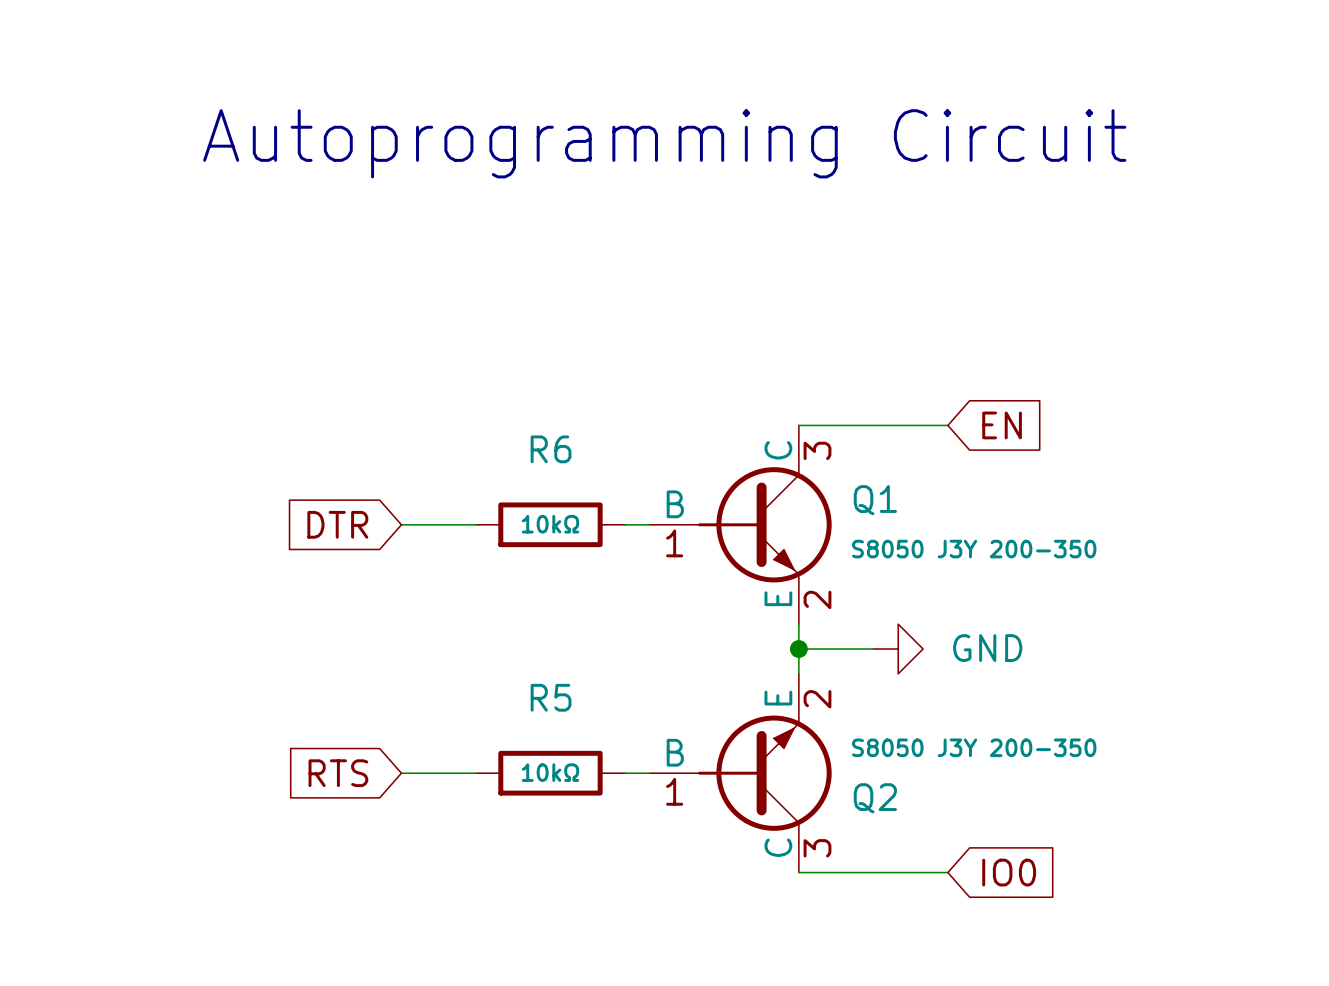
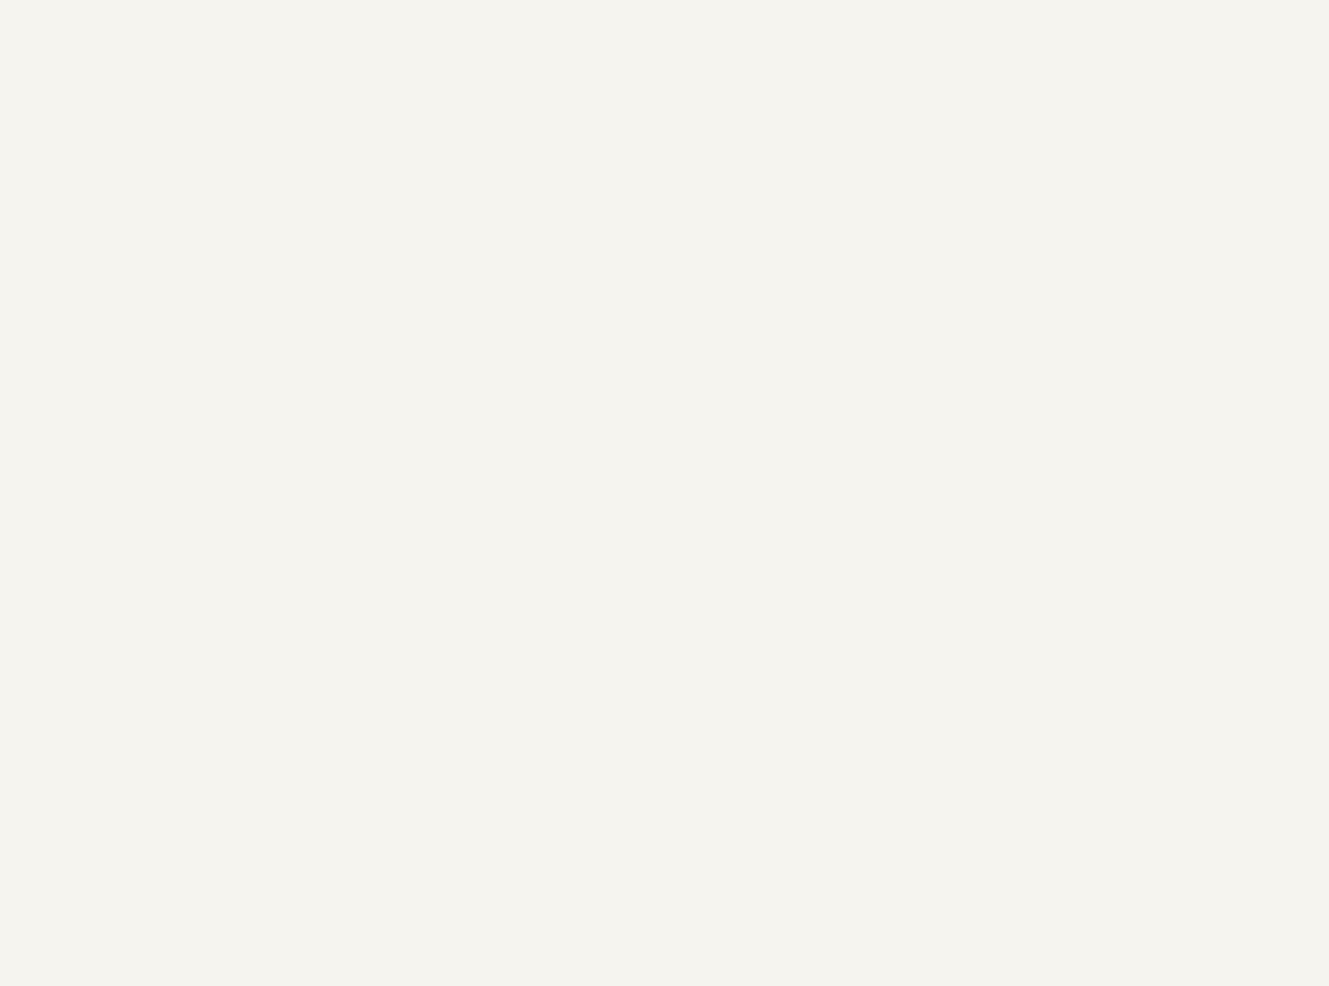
text: Autoprogramming Circuit (664, 143) -> none
wire: (798, 425) (947, 425) -> none
global label: EN (1002, 425) -> none
global label: DTR (337, 524) -> none
wire: (401, 524) (475, 524) -> none
R6: 10kΩ (550, 524) -> none
wire: (624, 524) (649, 524) -> none
Q1: S8050 J3Y 200-350 (740, 524) -> none
wire: (798, 624) (798, 673) -> none
wire: (798, 649) (873, 649) -> none
junction: (798, 649) -> none
power symbol: GND (898, 649) -> none
global label: RTS (338, 773) -> none
wire: (401, 773) (475, 773) -> none
R5: 10kΩ (550, 773) -> none
wire: (624, 773) (649, 773) -> none
Q2: S8050 J3Y 200-350 (740, 773) -> none
wire: (798, 872) (947, 872) -> none
global label: IO0 (1009, 872) -> none

